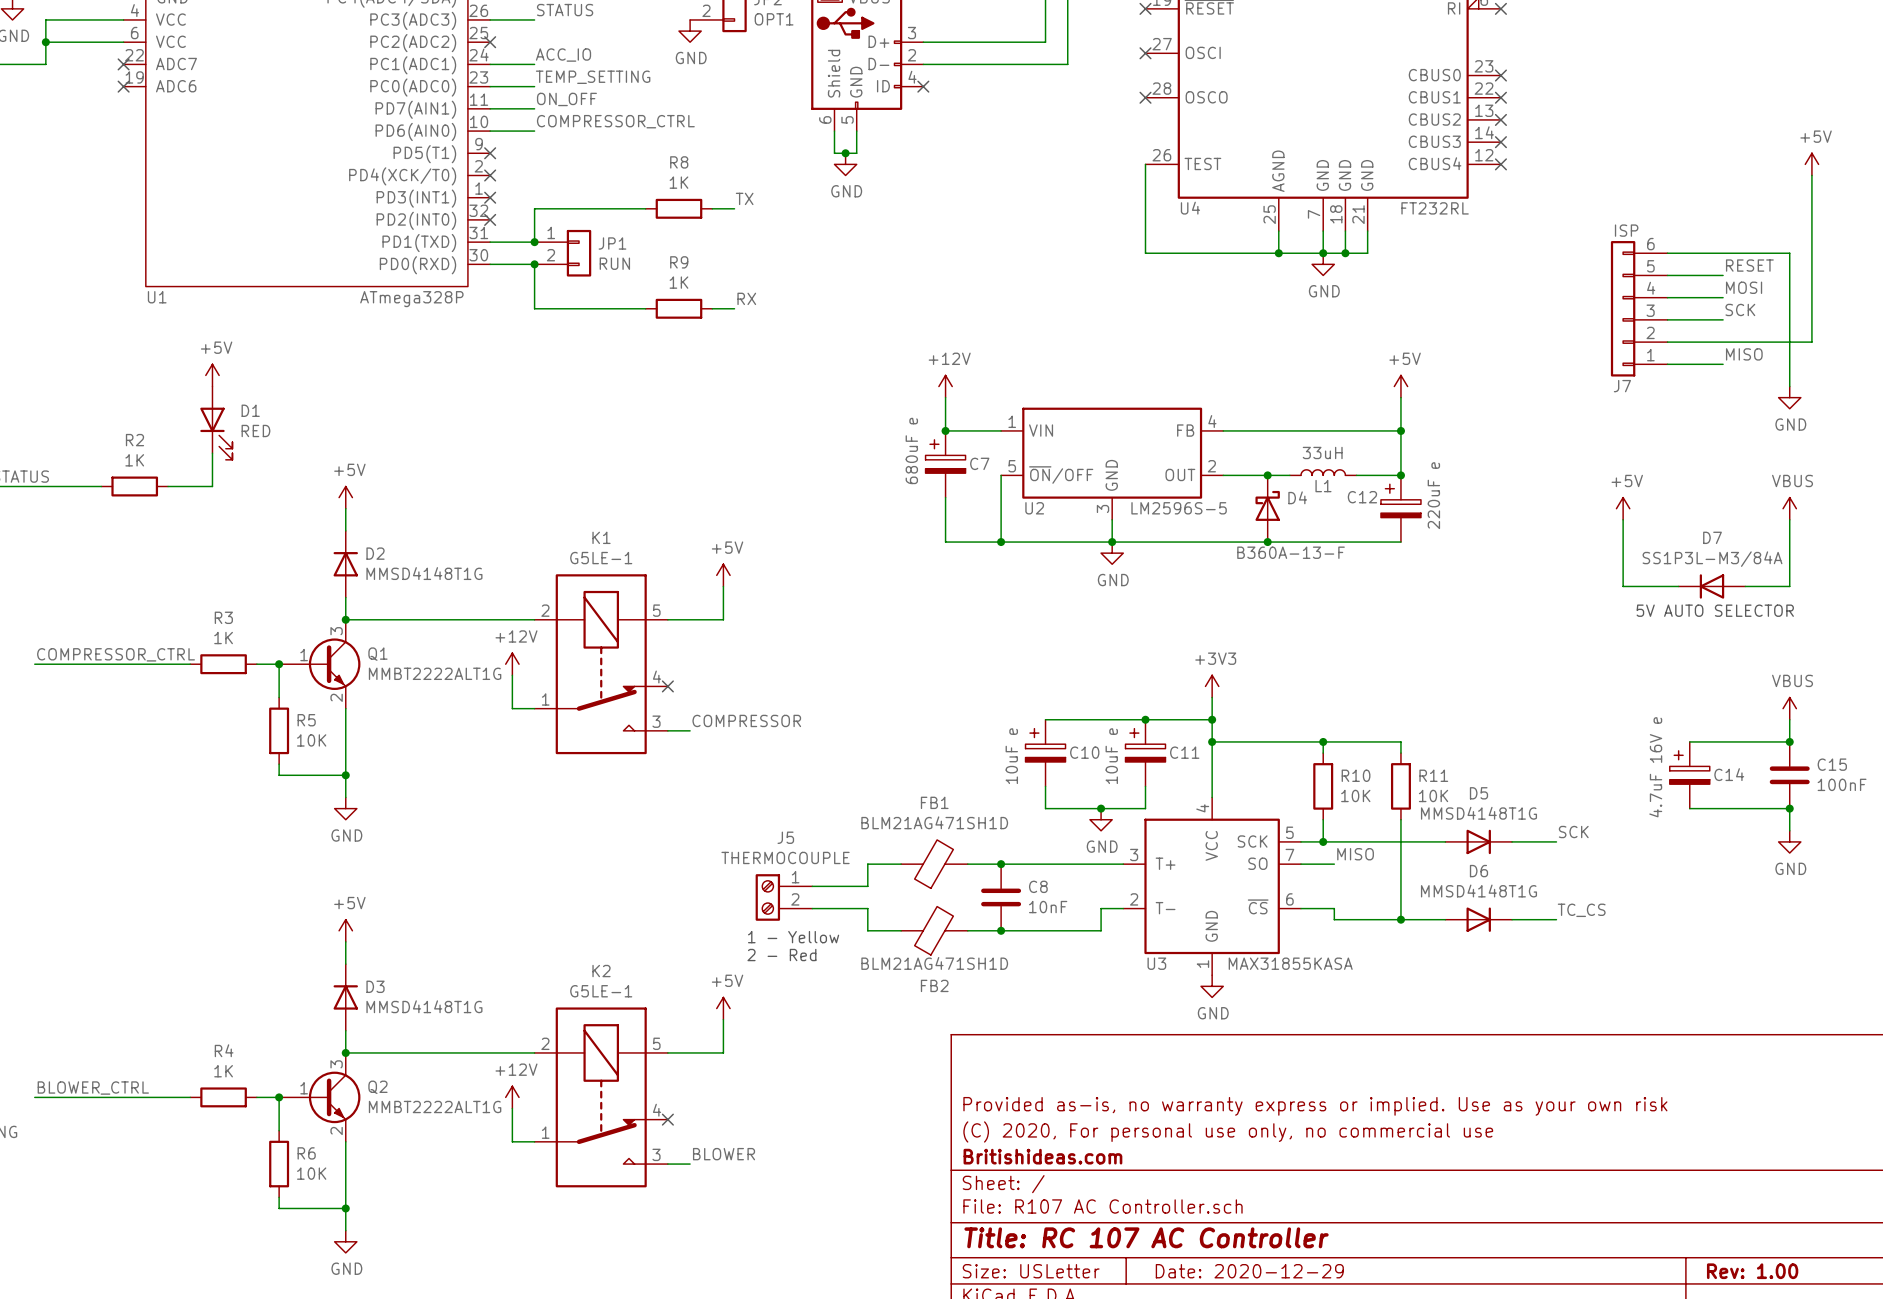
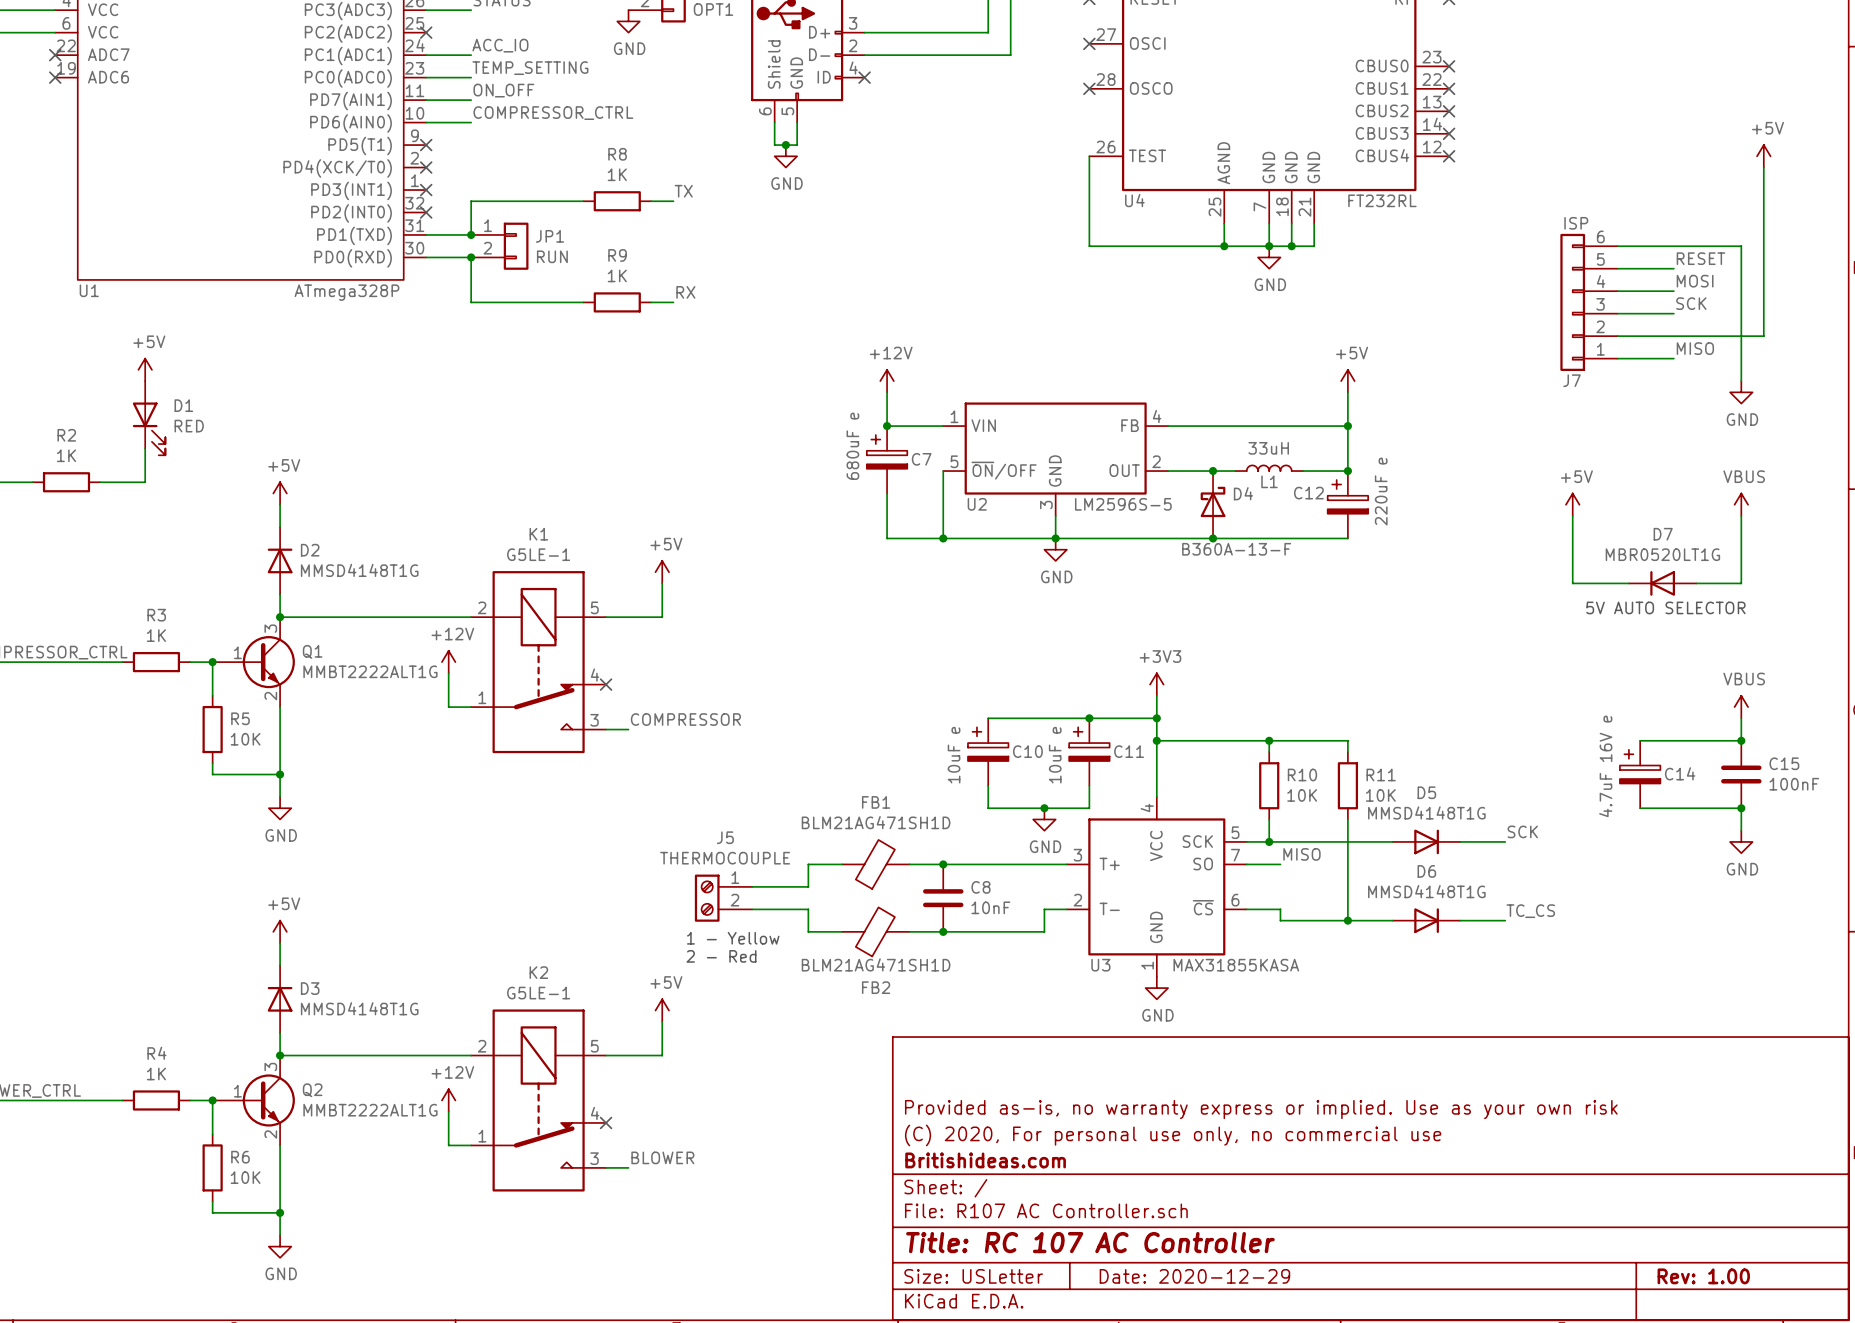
D7 value: SS1P3L-M3/84A (1712, 559) -> MBR0520LT1G (1662, 554)

